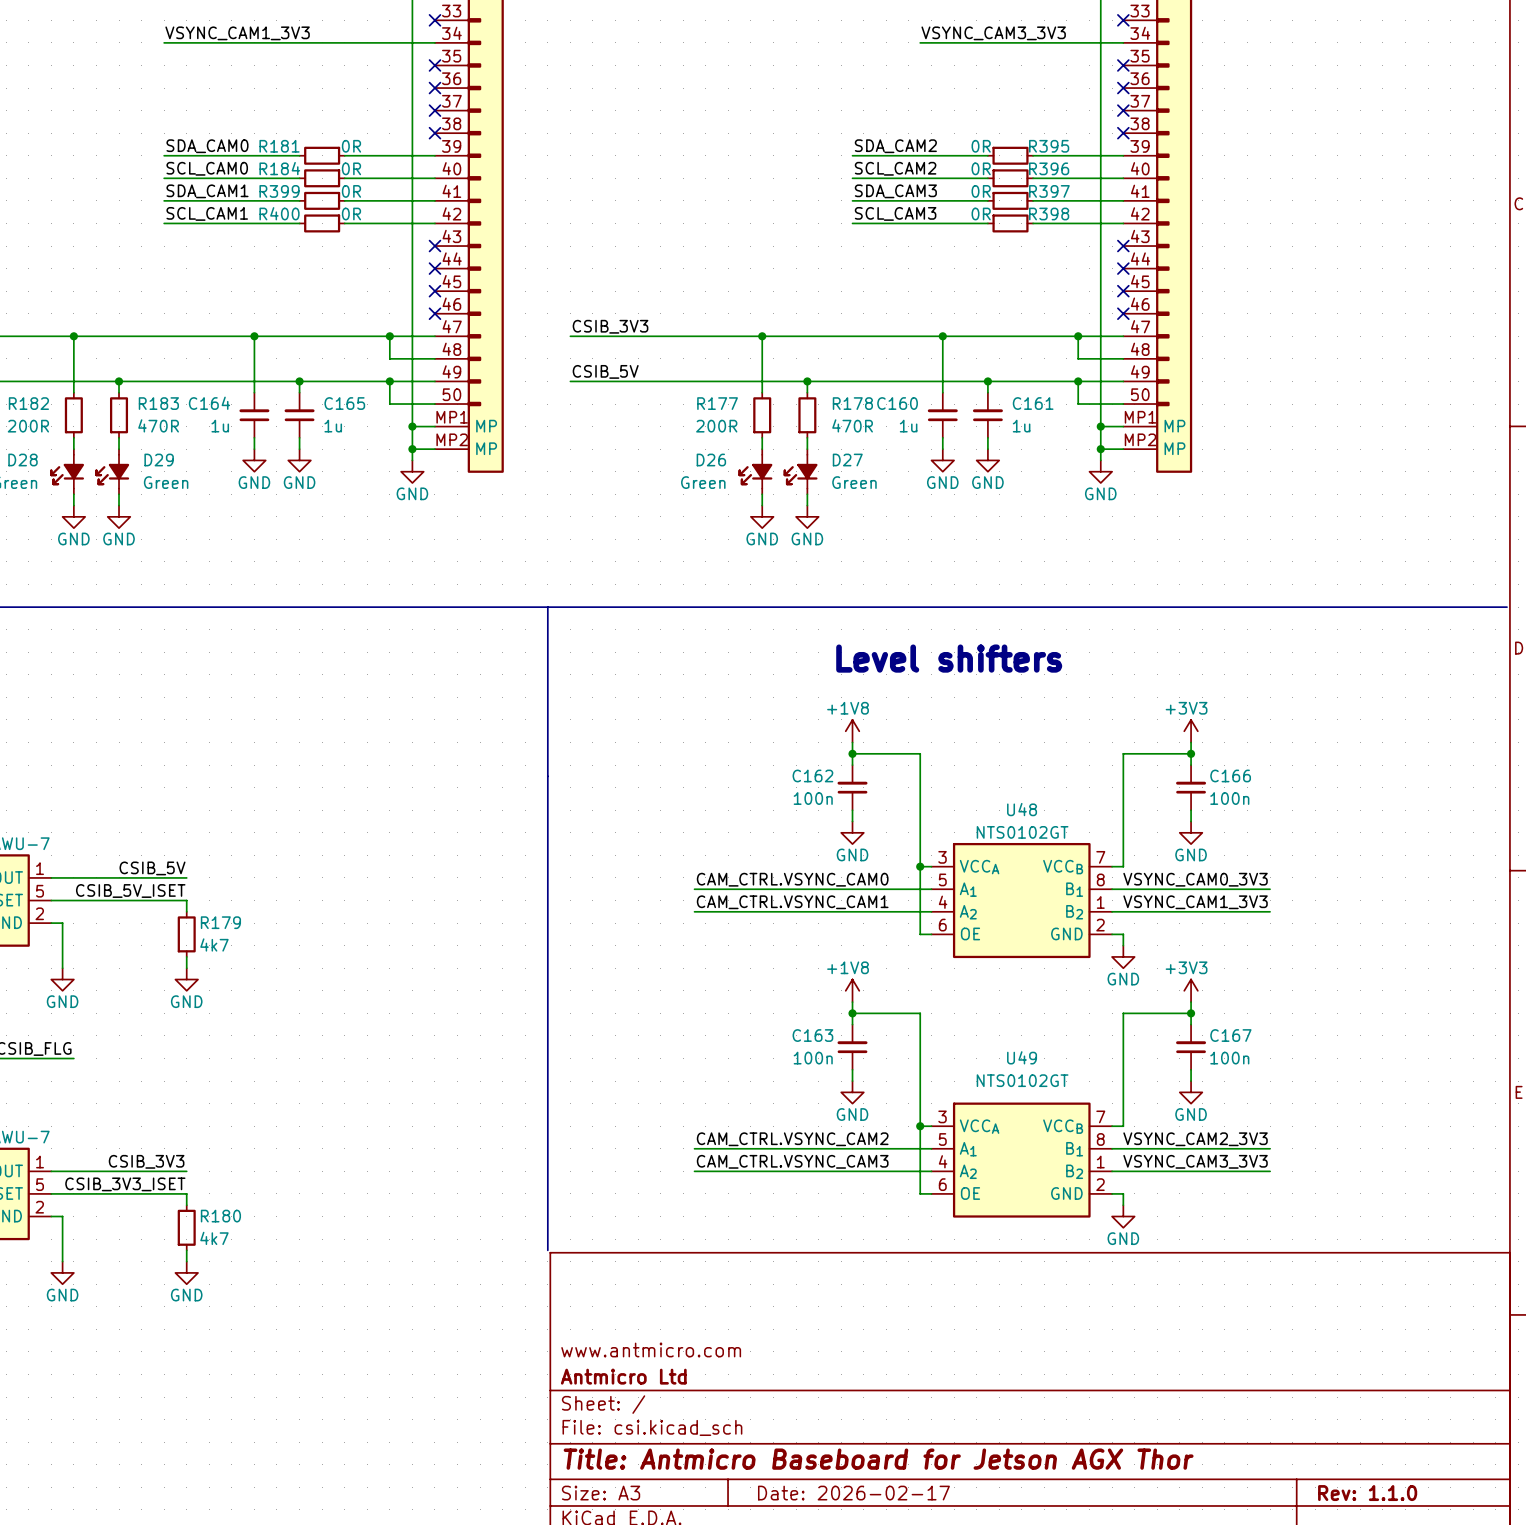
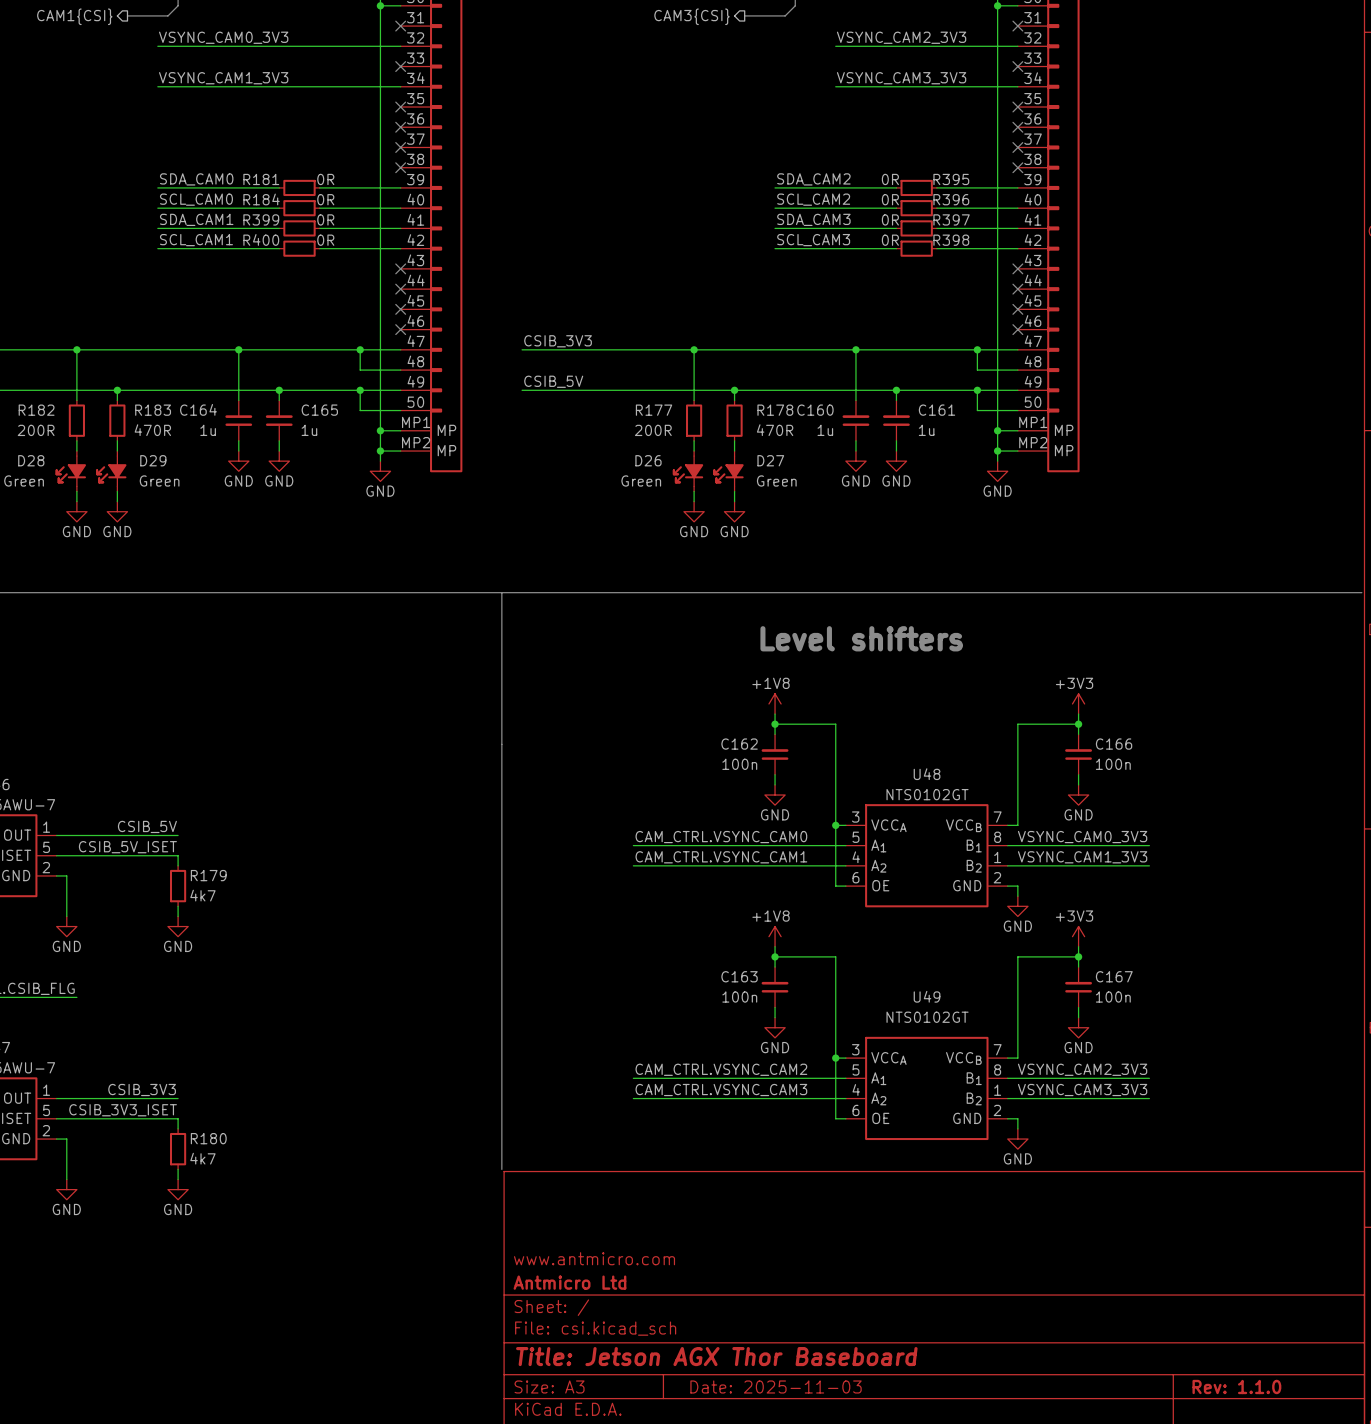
title block: Title: Antmicro Baseboard for Jetson AGX Thor (878, 1459) -> Title: Jetson AGX Thor Baseboard (716, 1356)
title block: Date: 2026-02-17 (853, 1493) -> Date: 2025-11-03 (776, 1386)

